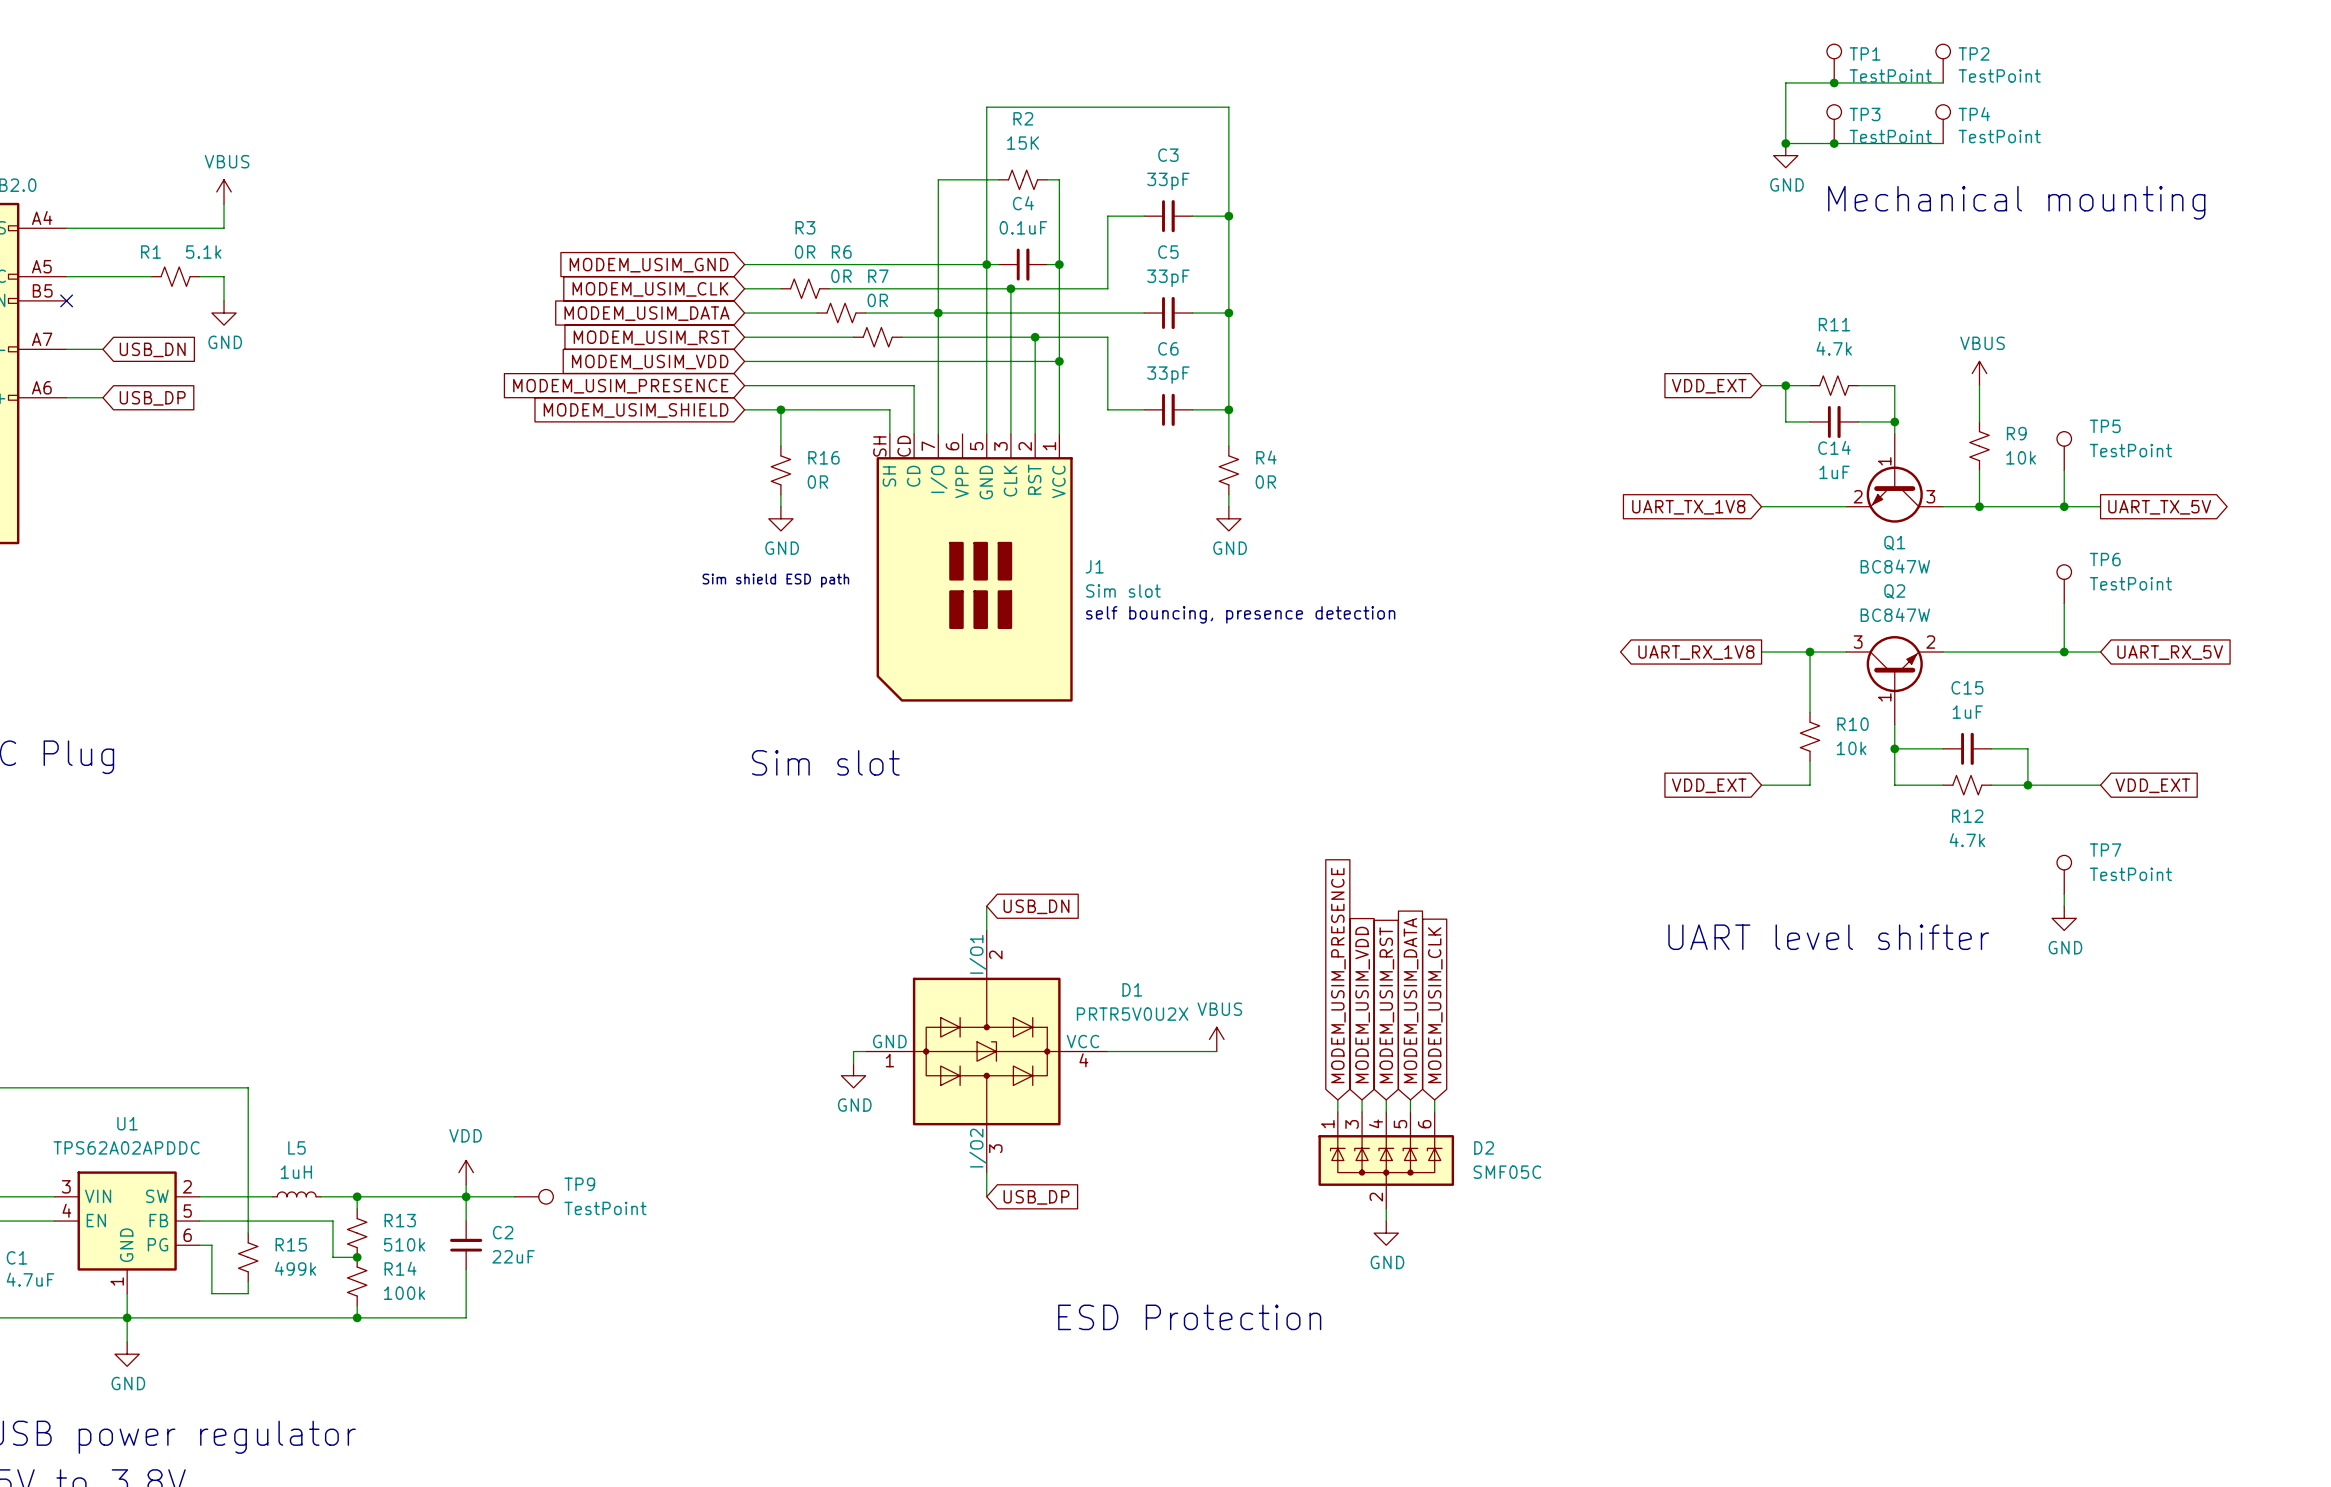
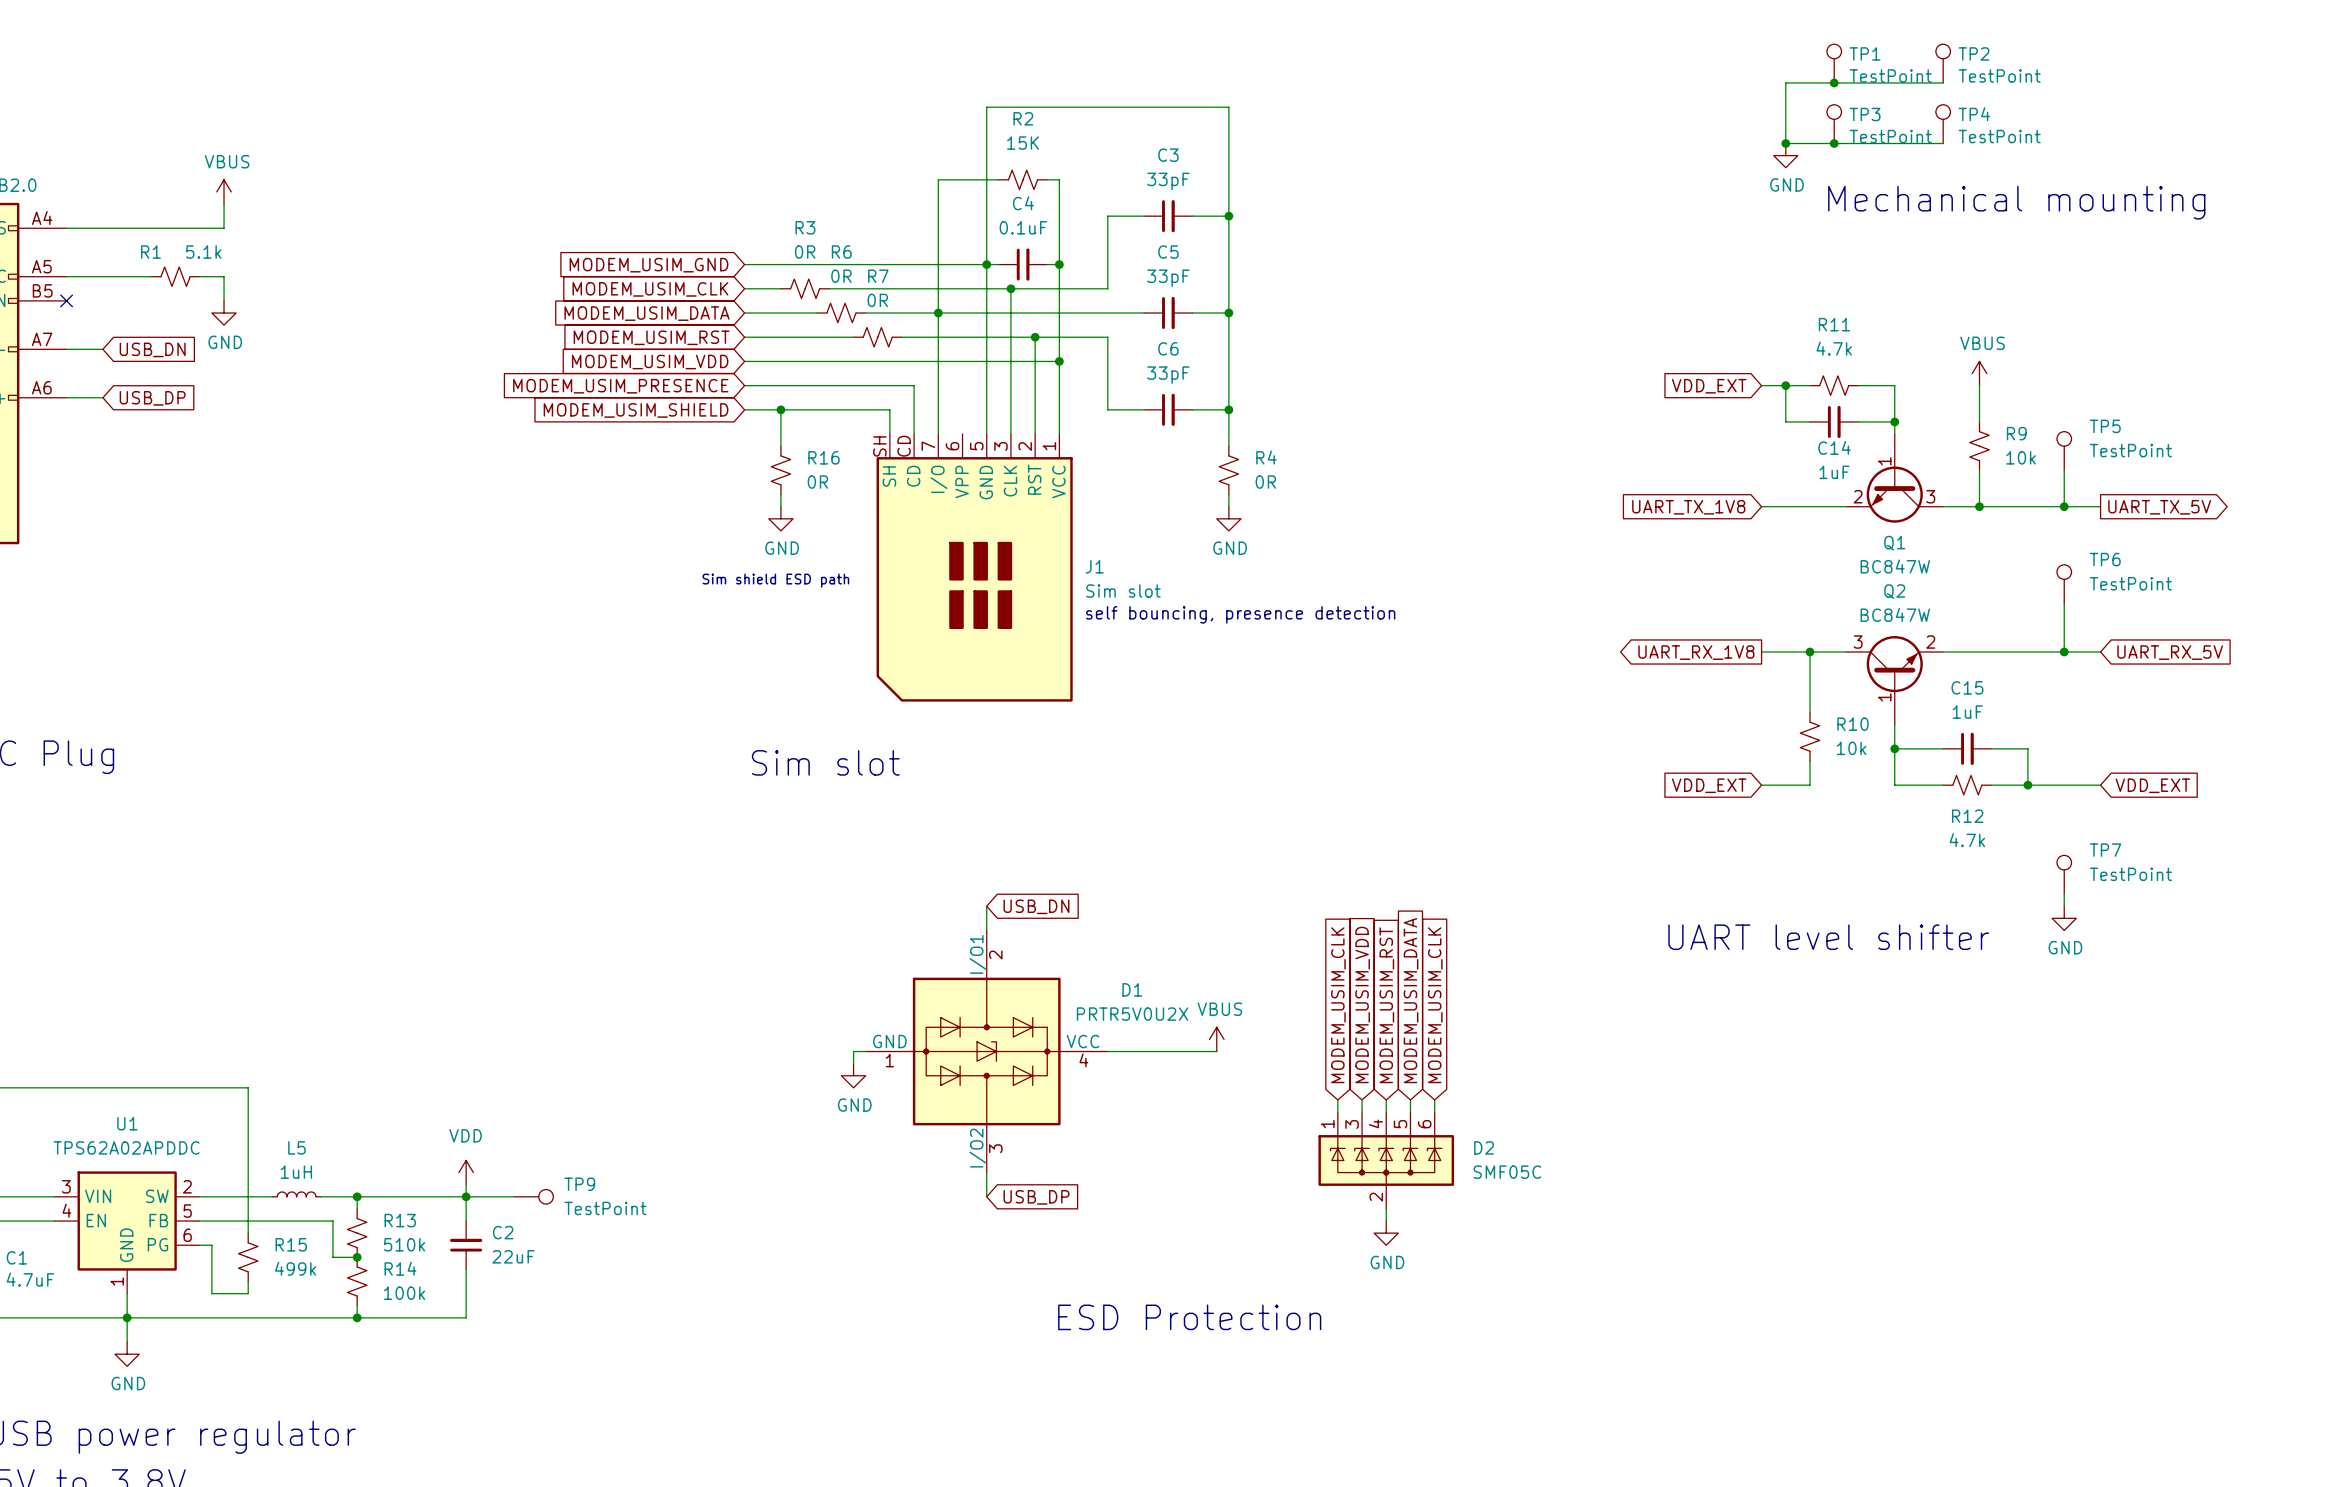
global label: MODEM_USIM_PRESENCE (1338, 975) -> MODEM_USIM_CLK (1338, 1005)

